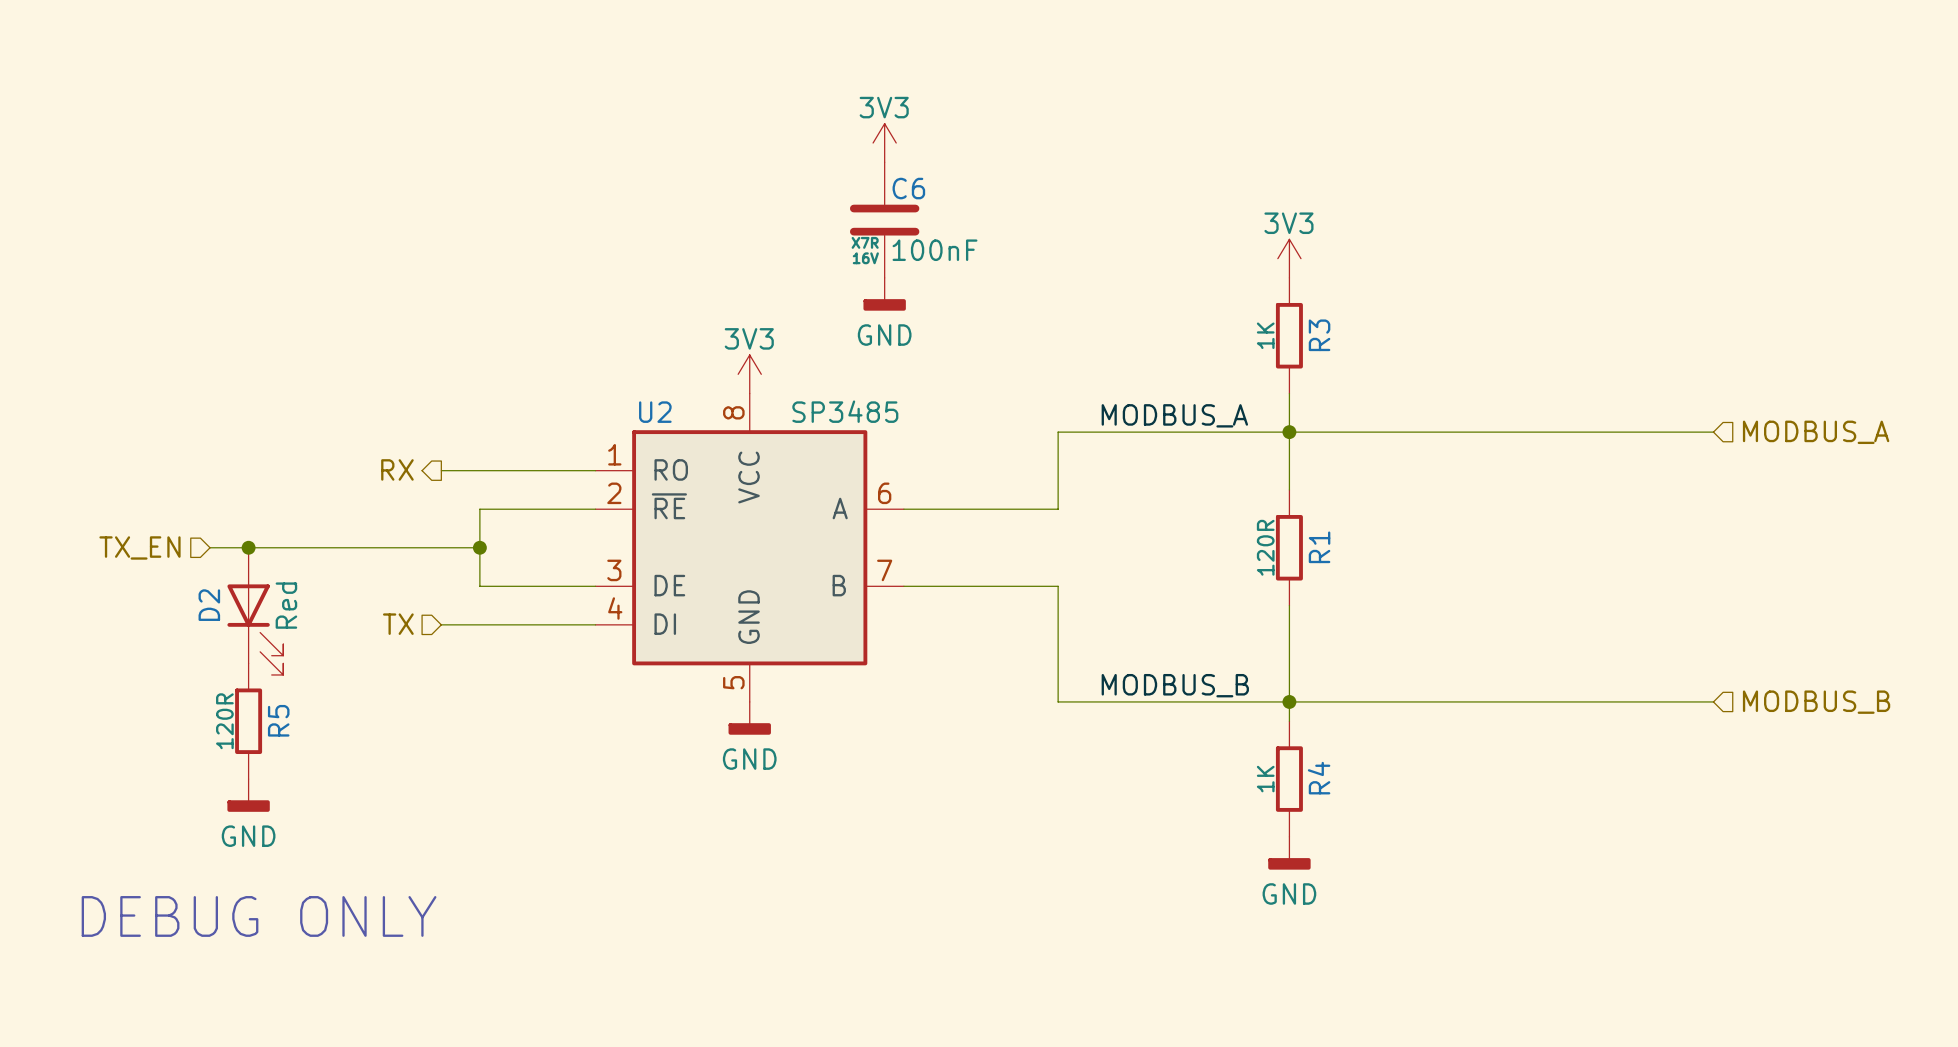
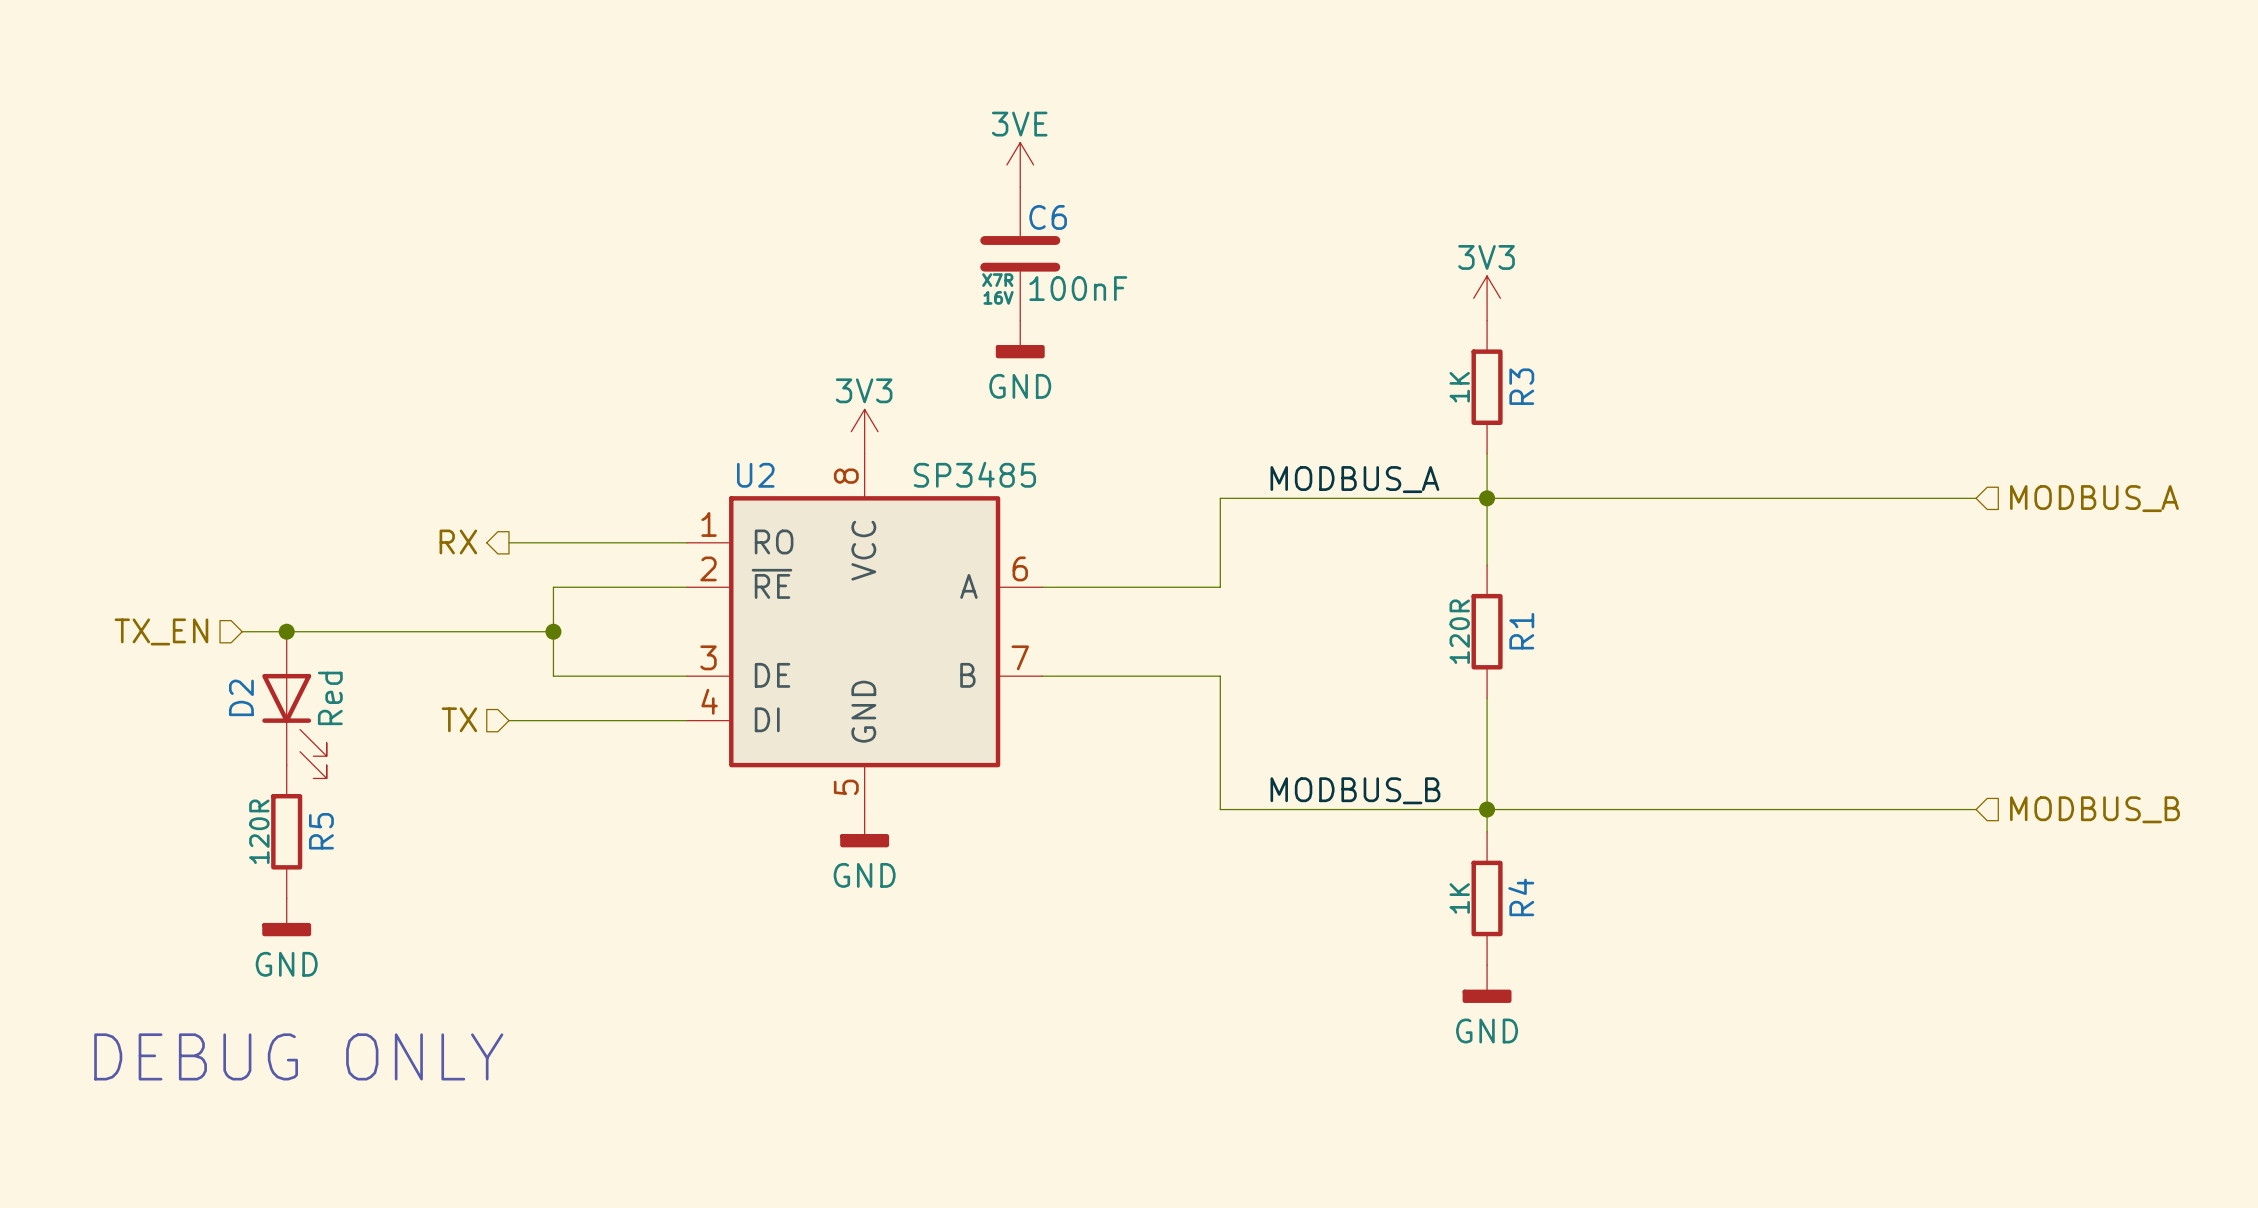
power symbol: 3V3 (884, 143) -> 3VE (1020, 164)

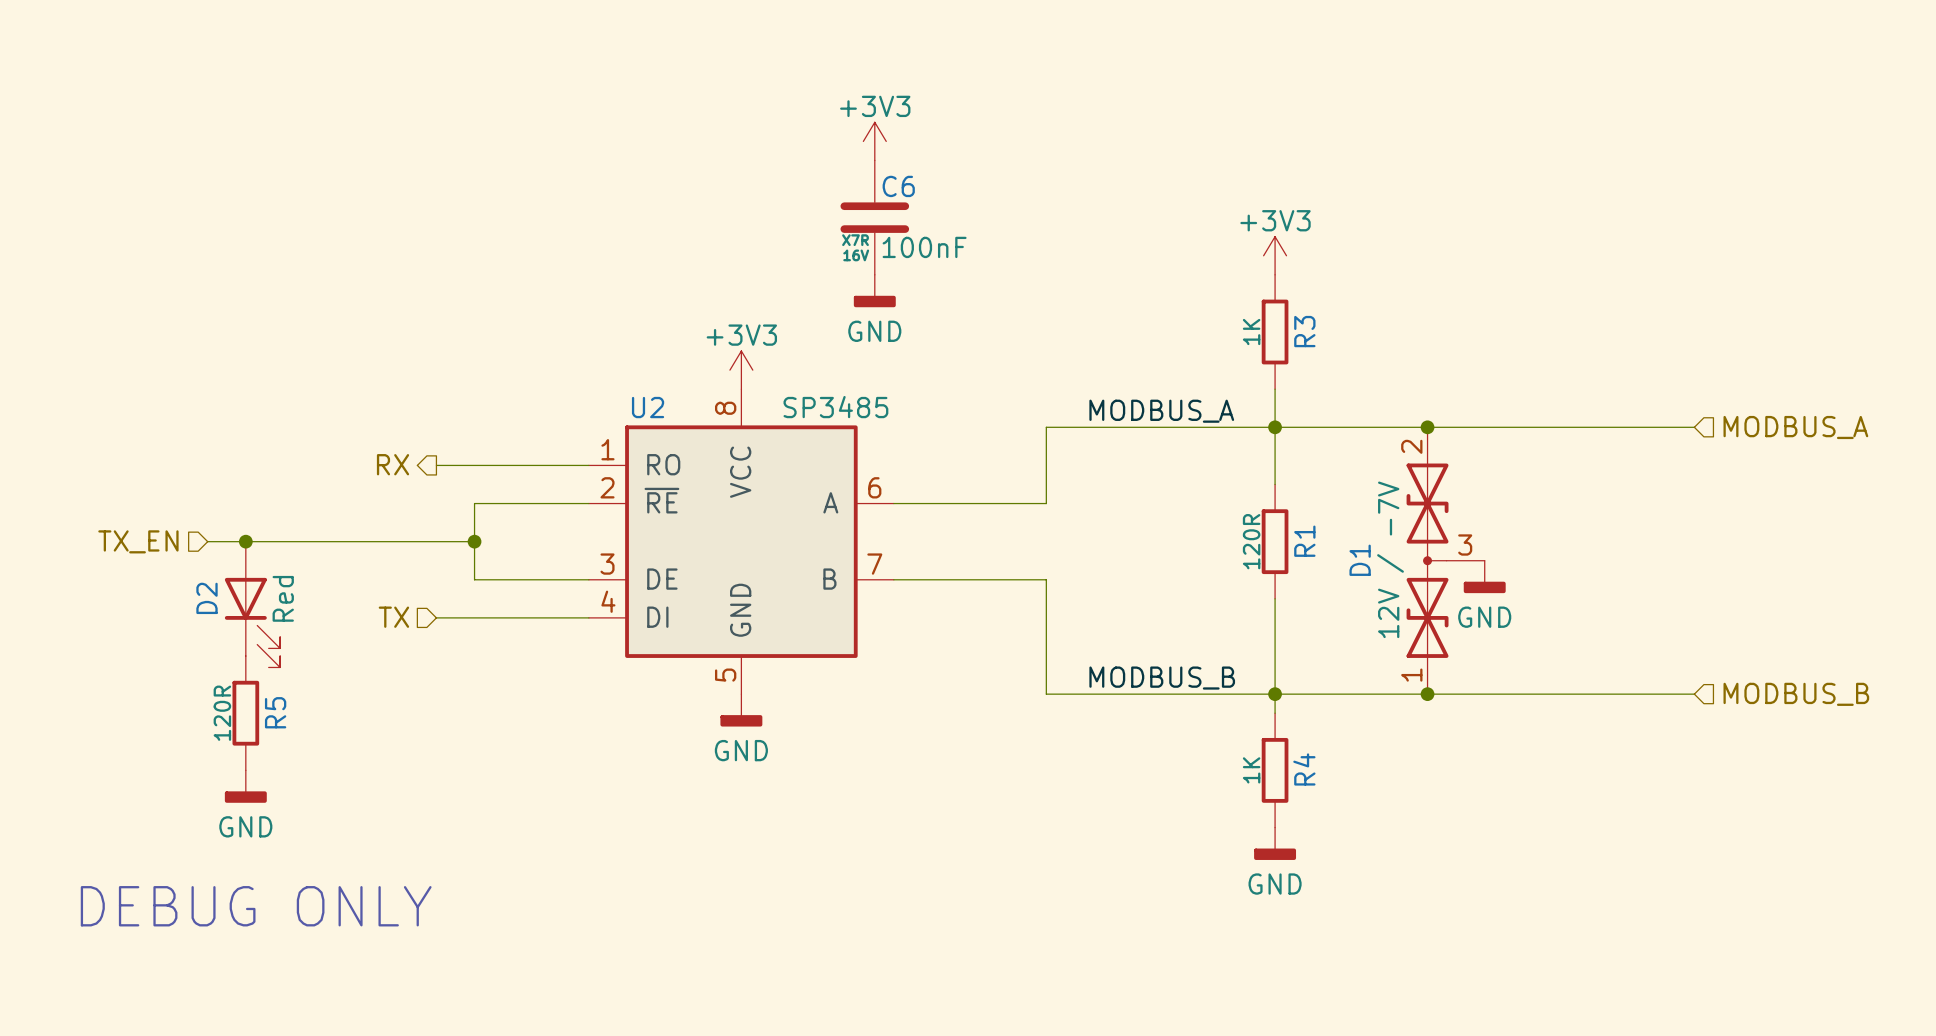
power symbol: 3VE (1020, 164) -> +3V3 (874, 141)
power symbol: 3V3 (1487, 298) -> +3V3 (1275, 255)
power symbol: 3V3 (864, 431) -> +3V3 (741, 370)
junction: none -> (1427, 427)
D1: none -> 12V / -7V (1445, 560)
power symbol: none -> GND (1484, 576)
junction: none -> (1427, 694)

